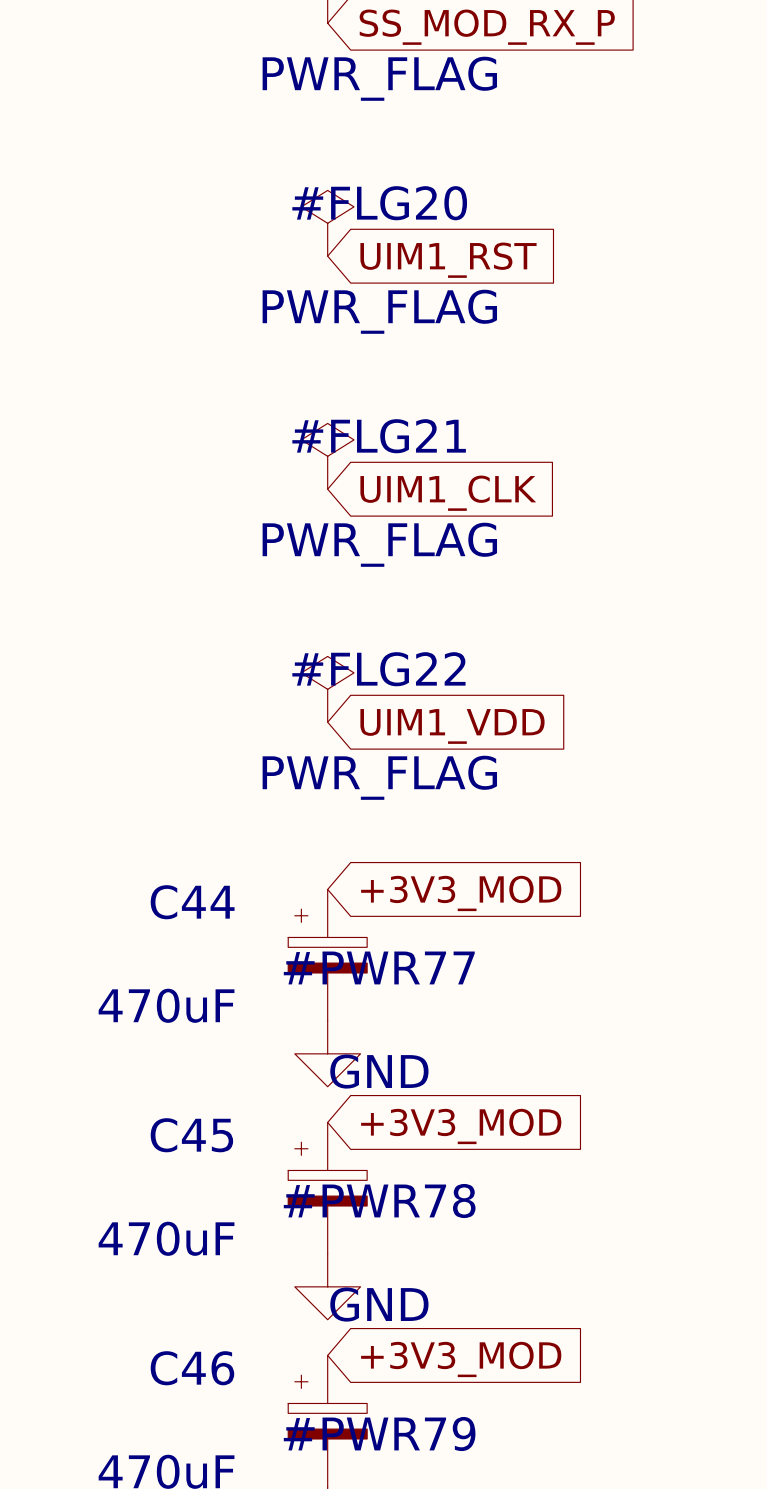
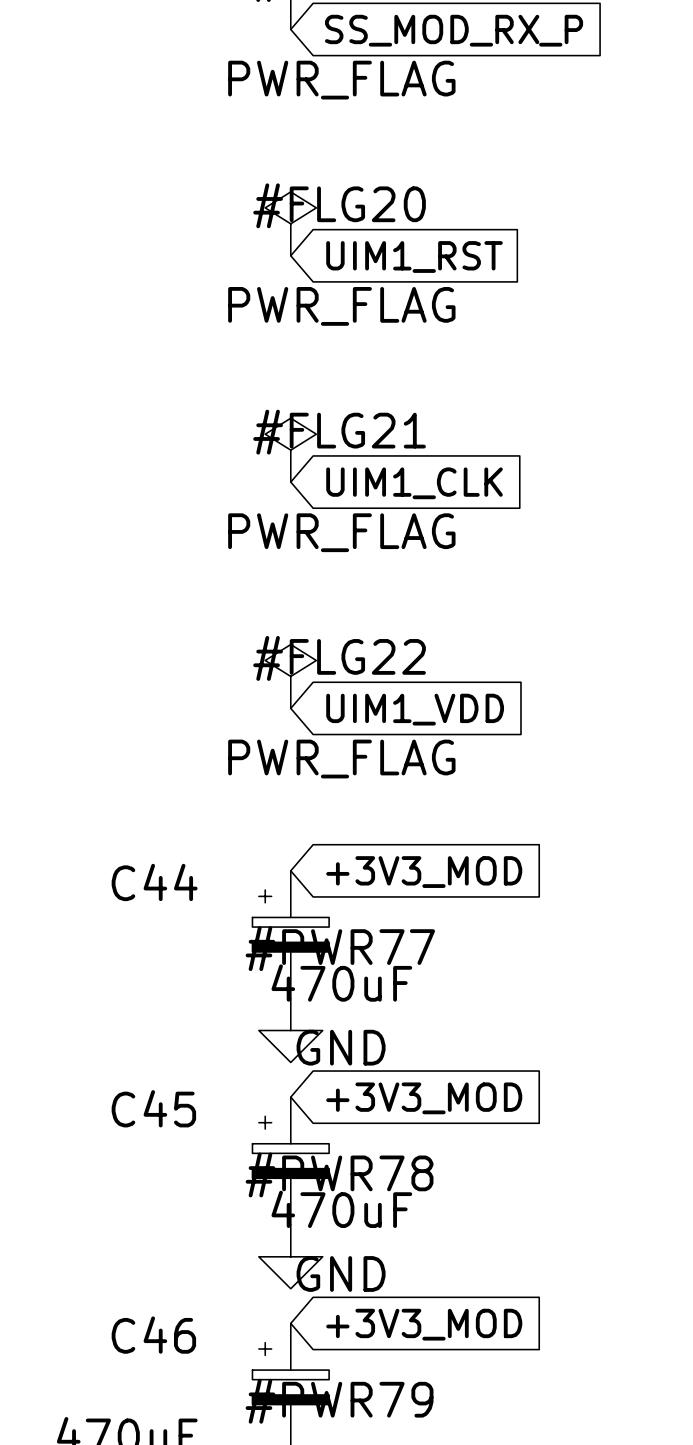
C44 value position: 470uF (166, 1005) -> 470uF (341, 983)
C45 value position: 470uF (166, 1238) -> 470uF (341, 1209)

